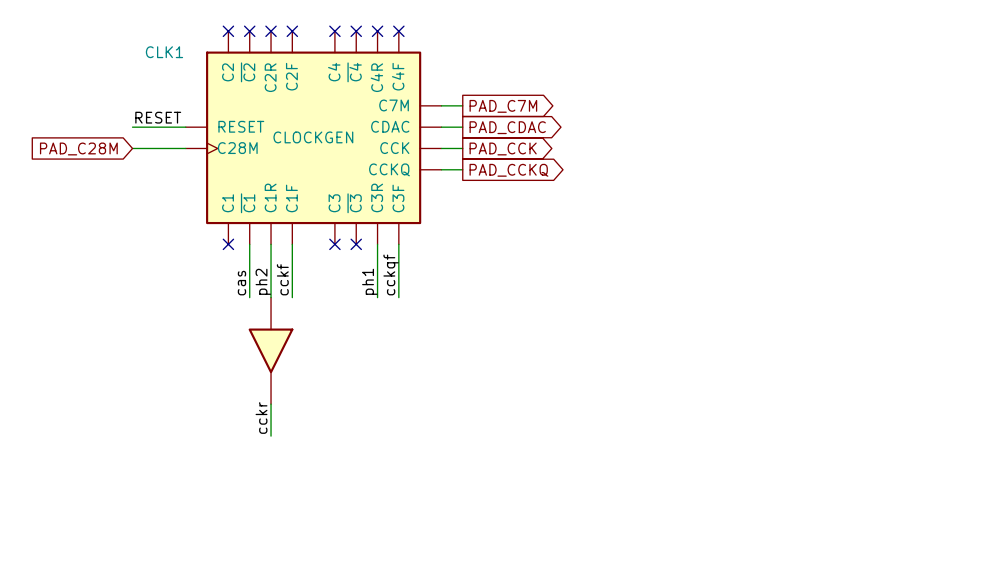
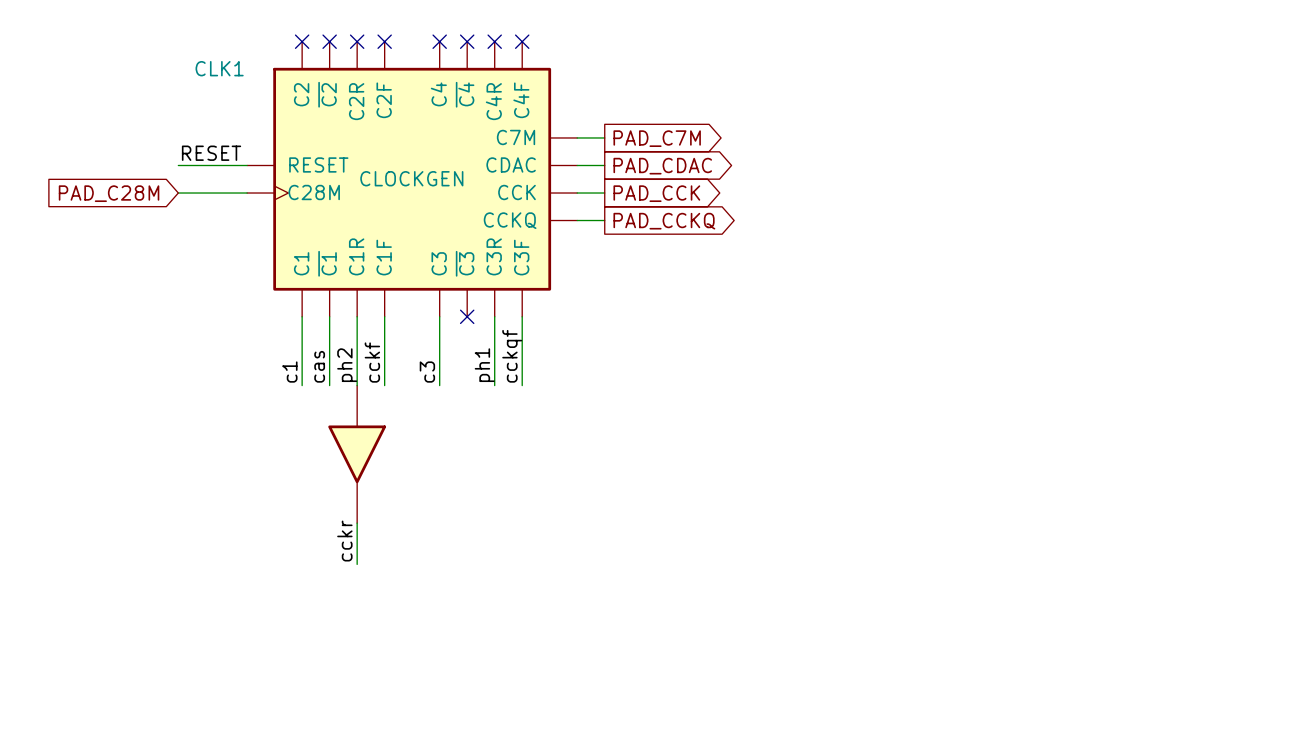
wire: none -> (302, 316) (302, 385)
no-connect mark: (228, 244) -> none
wire: none -> (439, 316) (439, 385)
no-connect mark: (334, 244) -> none
label: none -> c1 (289, 372)
label: none -> c3 (427, 372)

